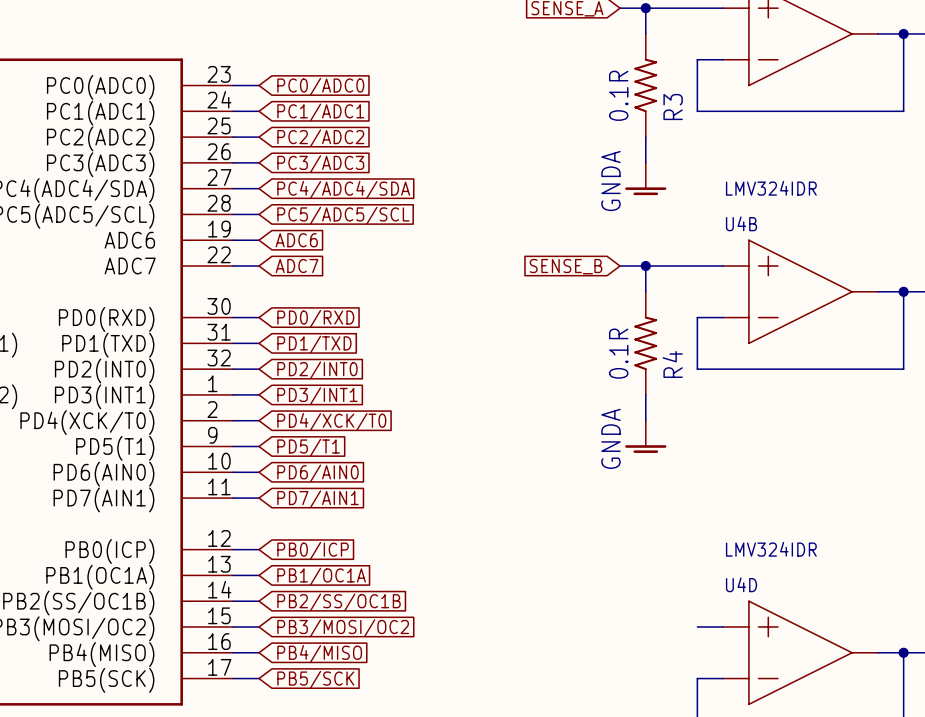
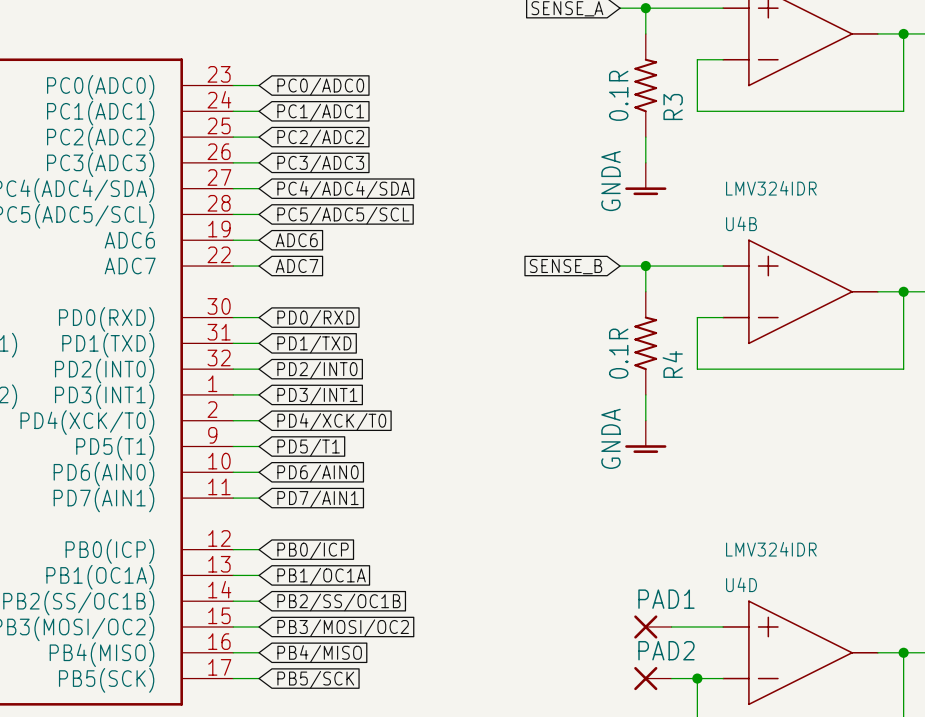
PAD1: none -> (652, 626)
wire: none -> (671, 626) (697, 626)
PAD2: none -> (652, 678)
wire: none -> (671, 678) (697, 678)
junction: none -> (697, 678)

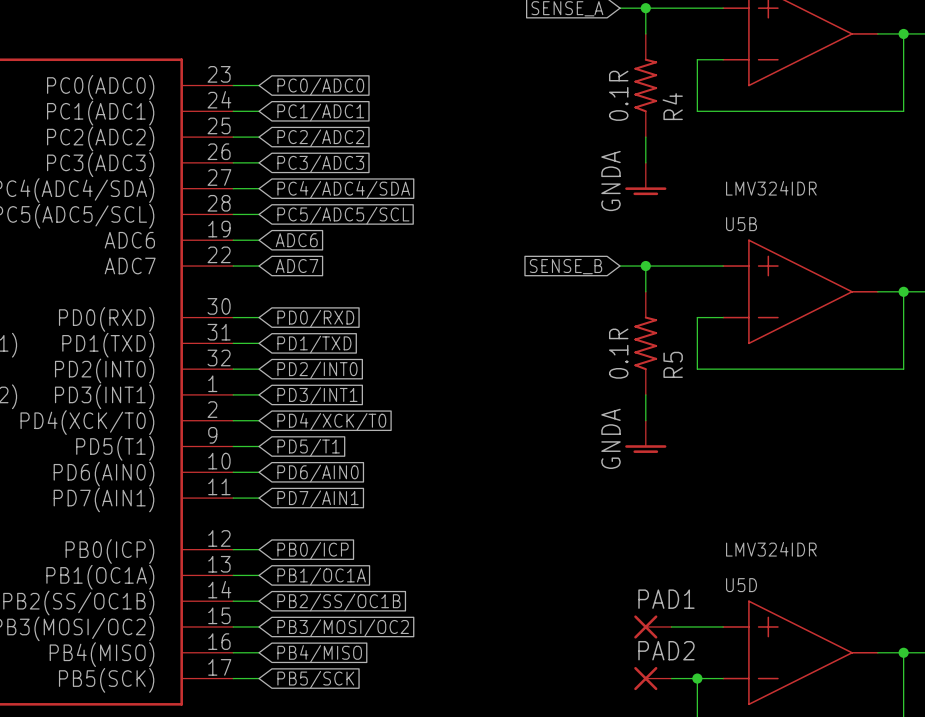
R3 name: R3 (673, 107) -> R4 (672, 106)
U4B name: U4B (741, 223) -> U5B (741, 224)
R4 name: R4 (672, 364) -> R5 (673, 364)
U4D name: U4D (741, 584) -> U5D (741, 585)

